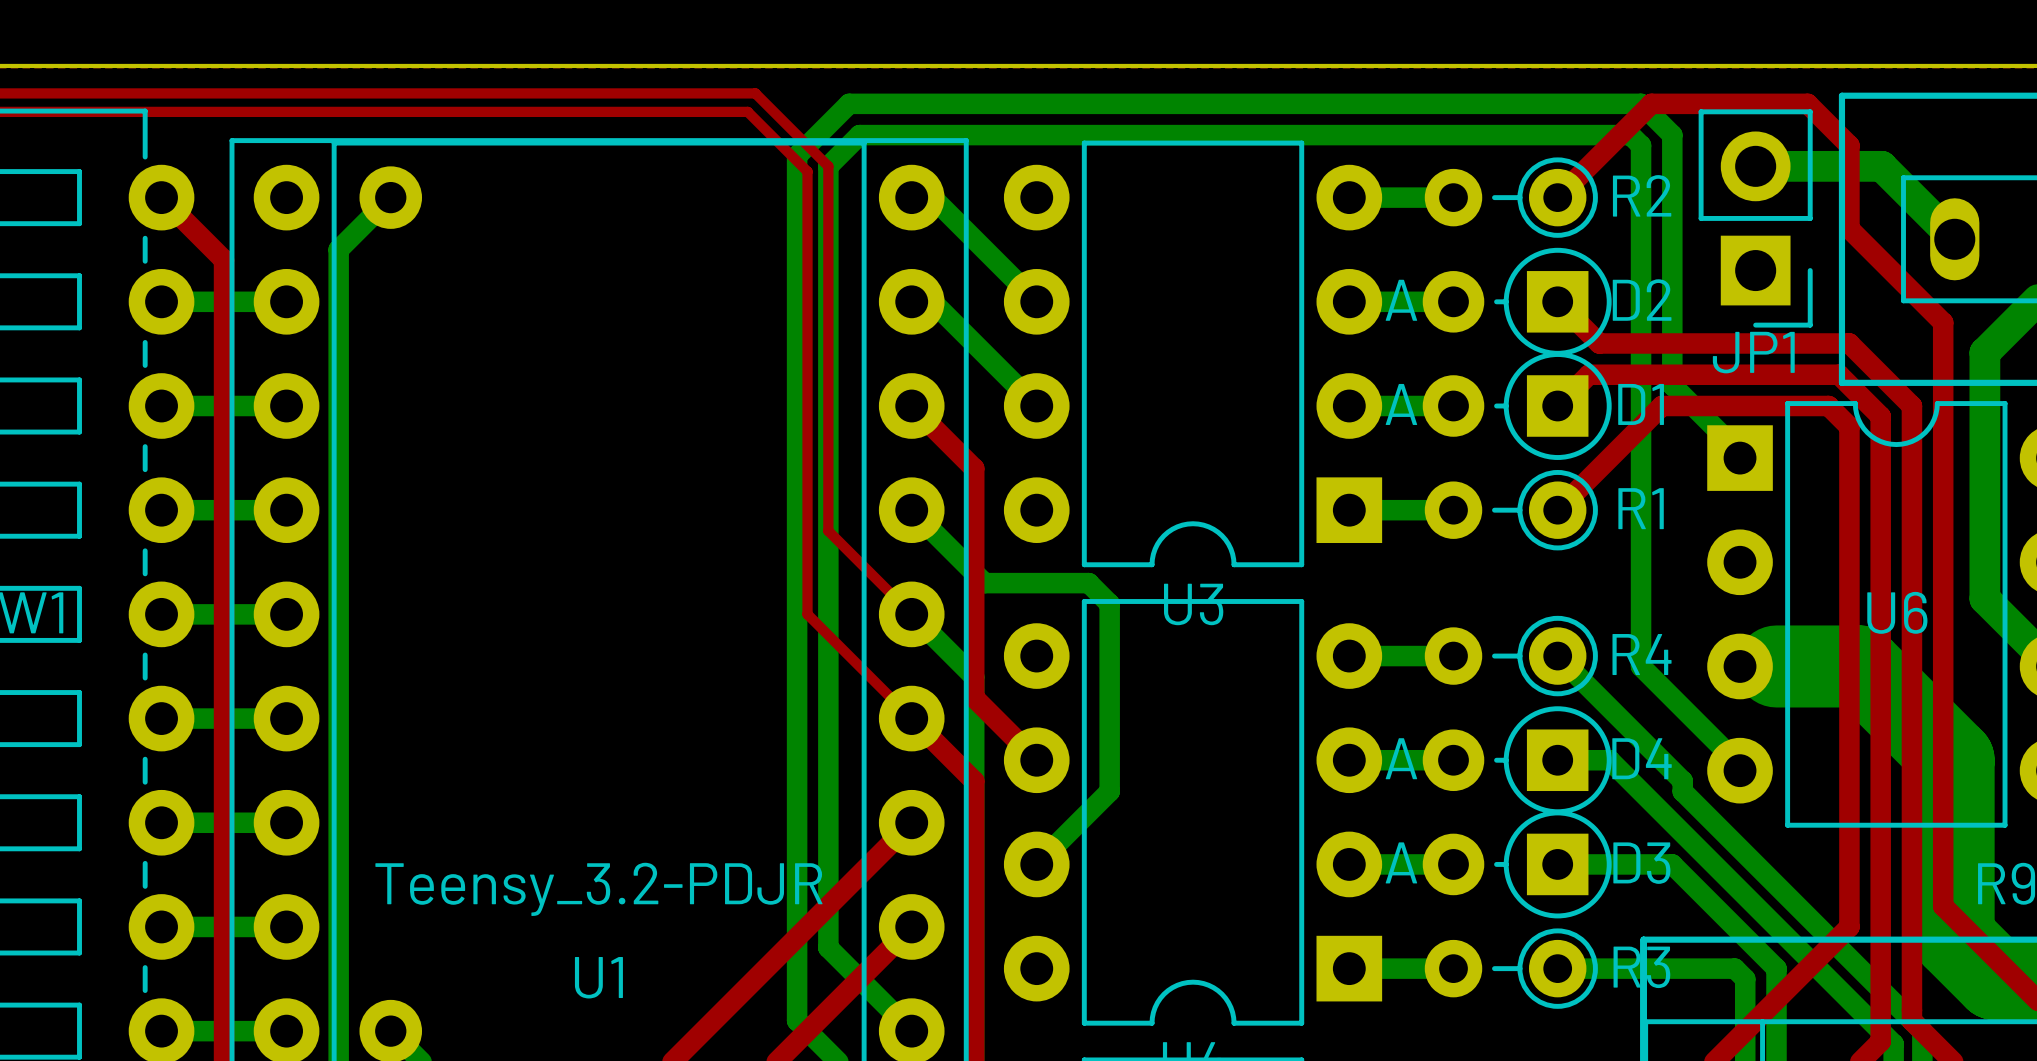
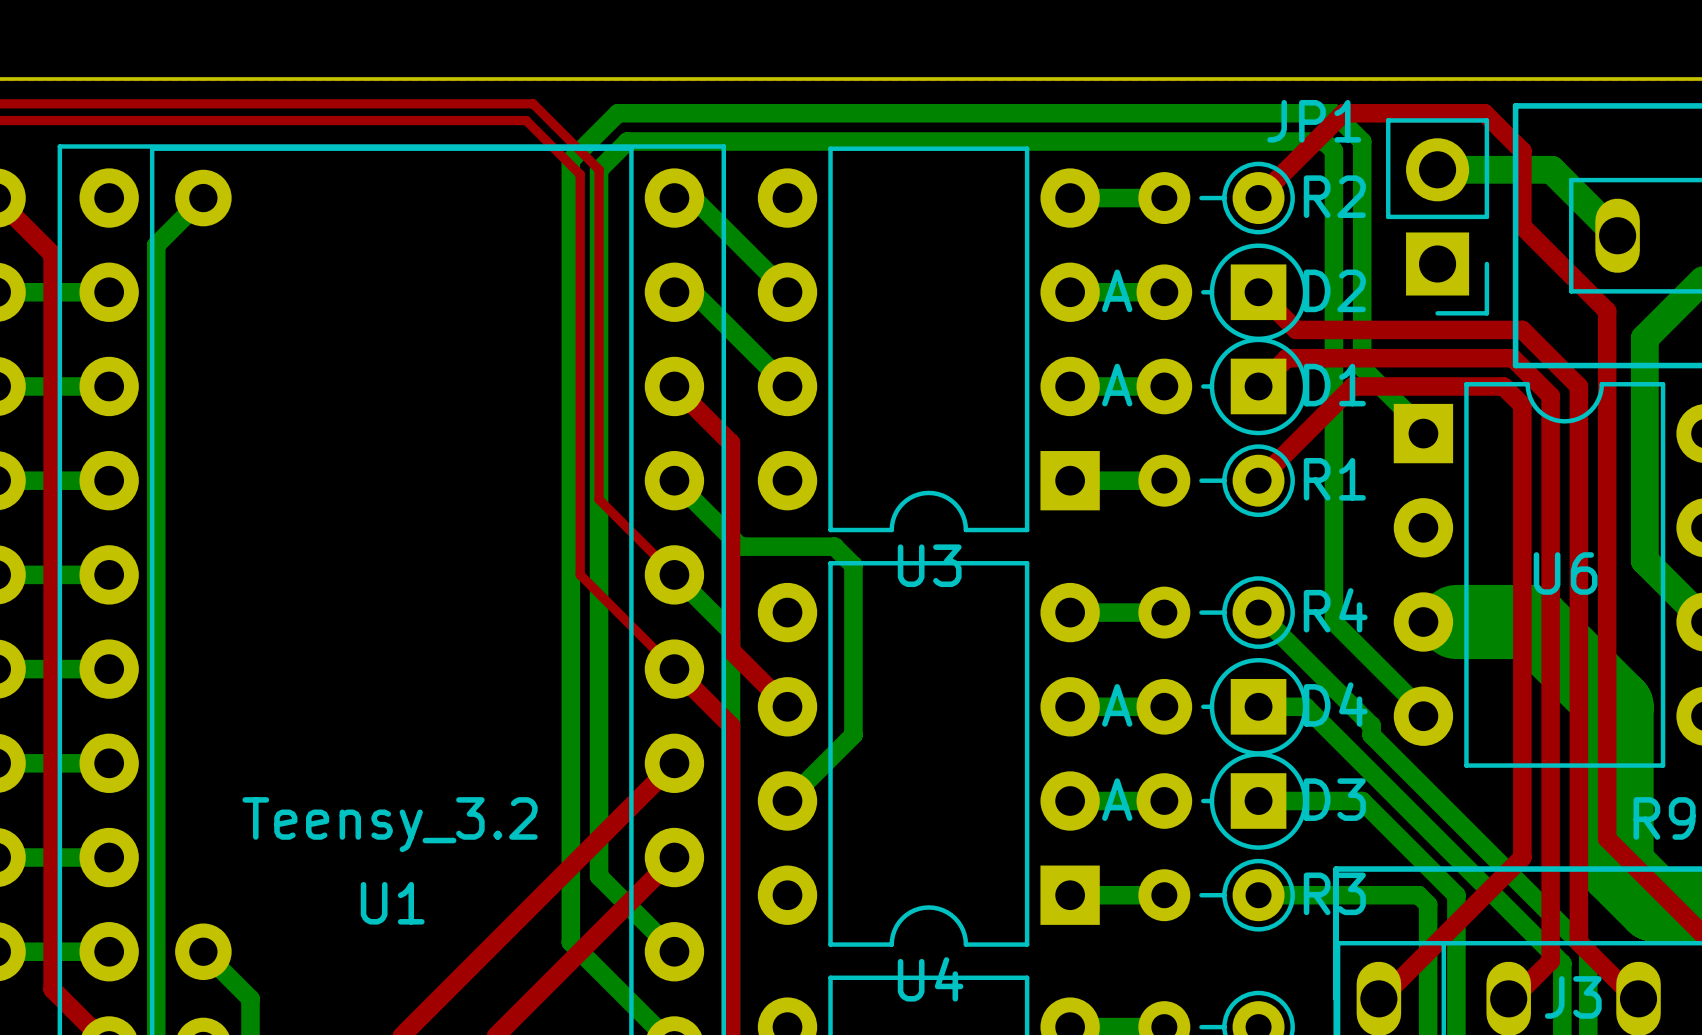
JP1 name position: JP1 (1753, 352) -> JP1 (1314, 121)
U1 value: Teensy_3.2-PDJR (598, 889) -> Teensy_3.2 (390, 824)

